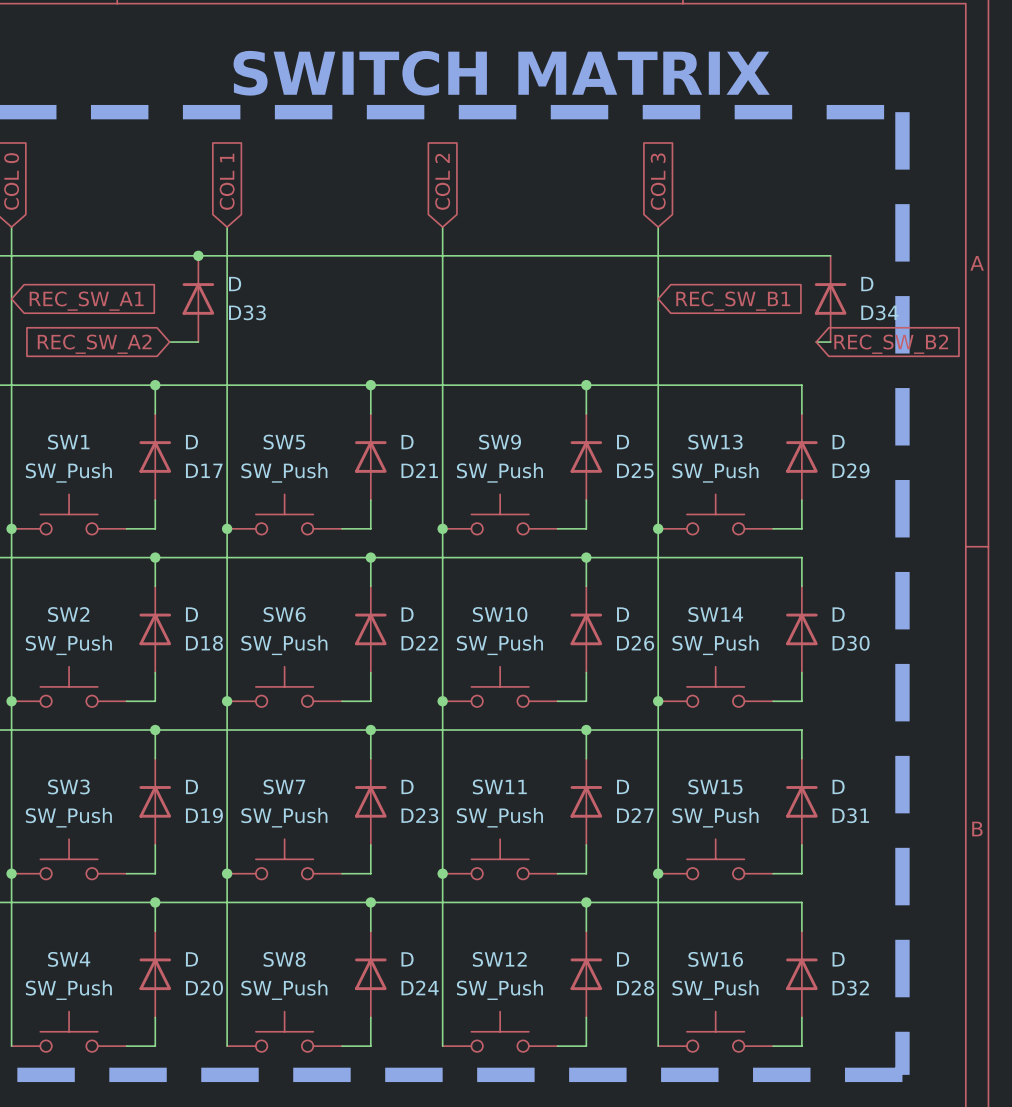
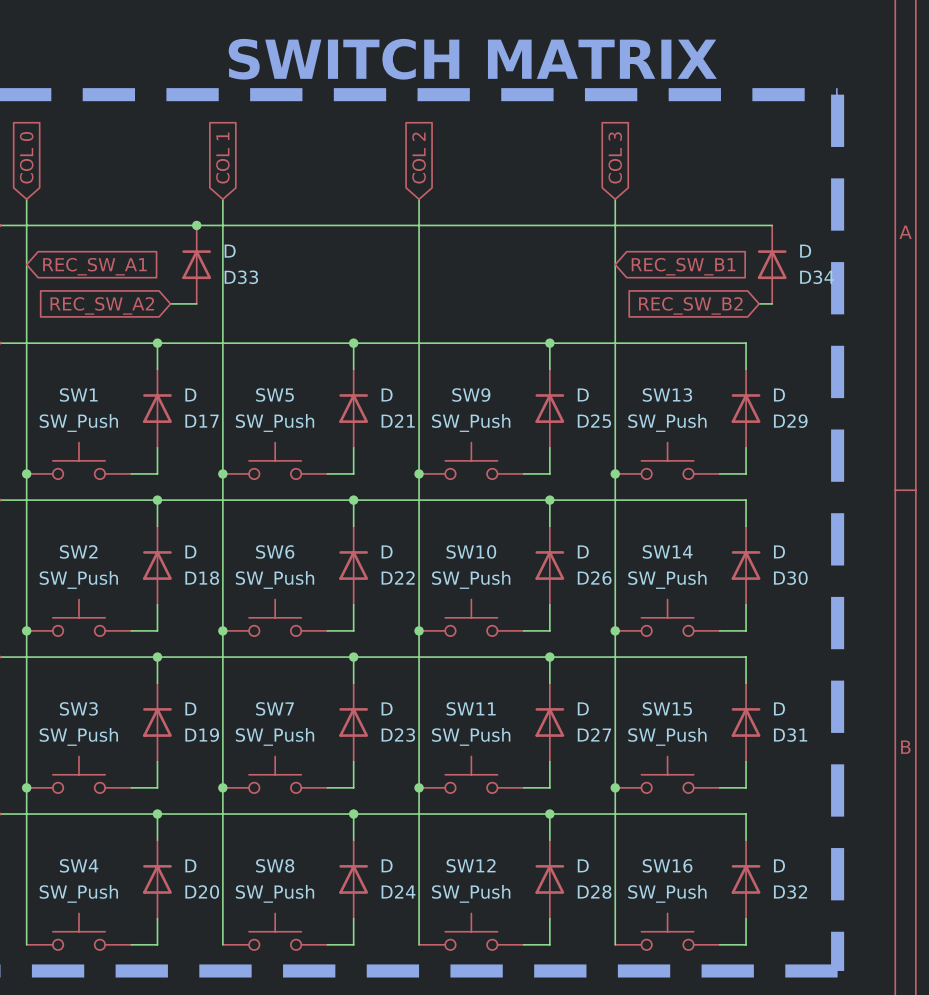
global label rotation: 0° (891, 344) -> 180° (690, 305)

